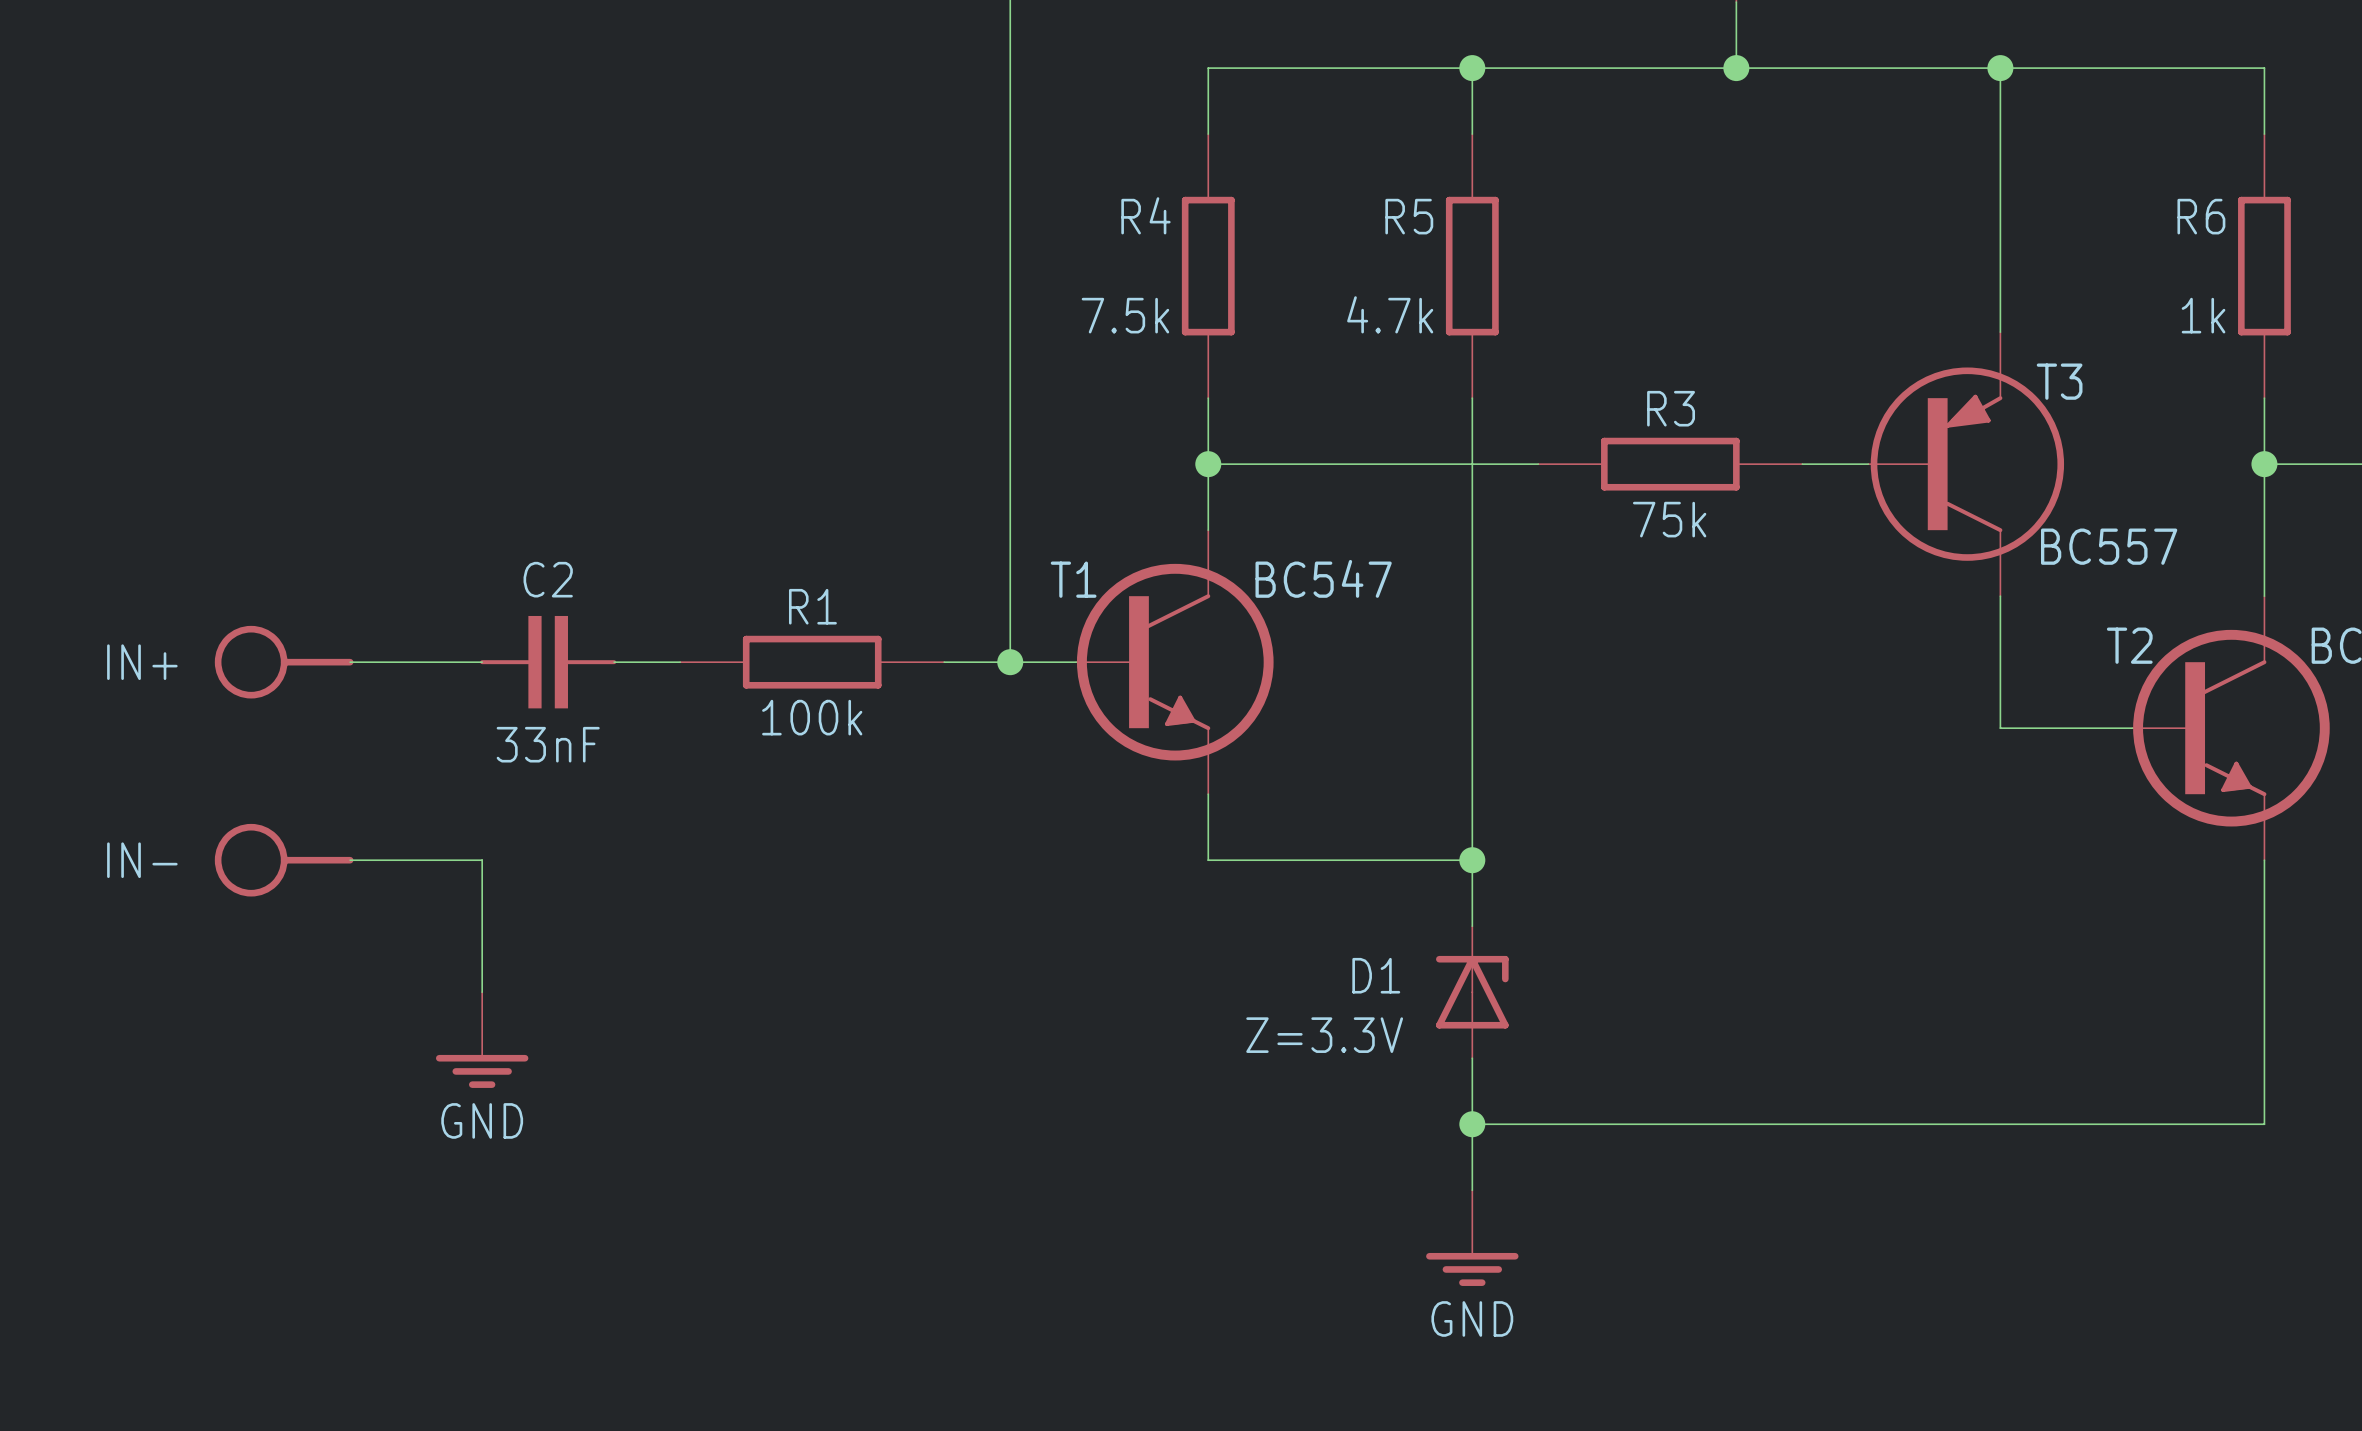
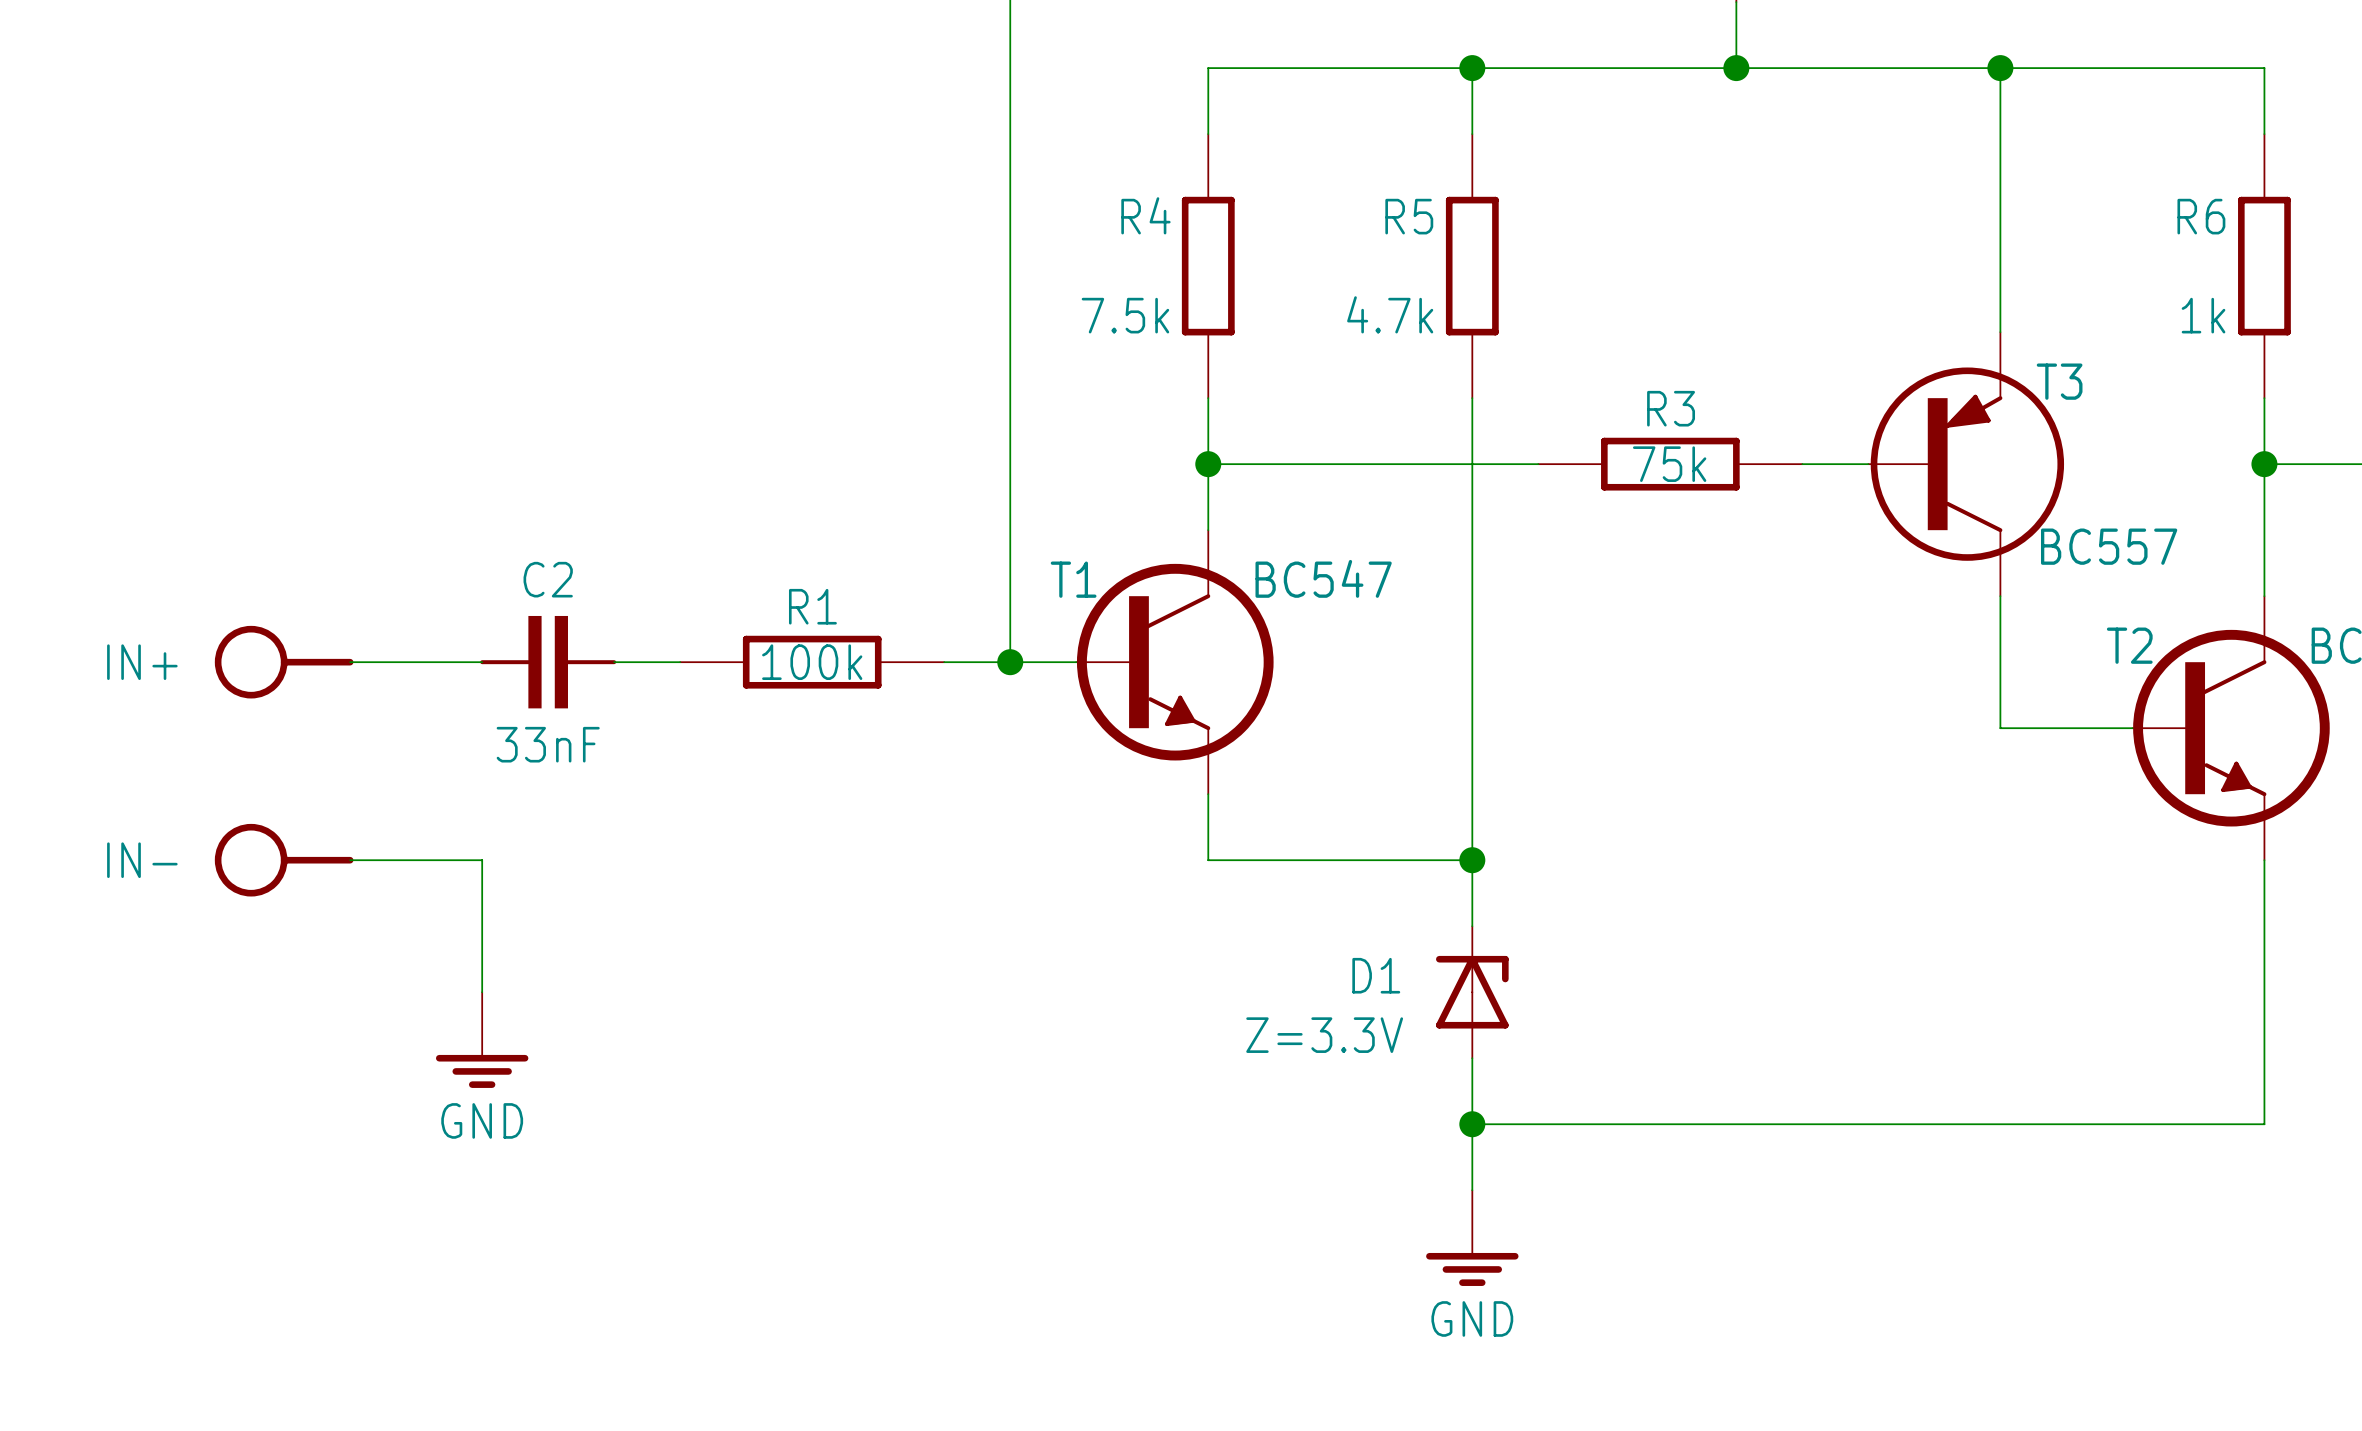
R3 value position: 75k (1669, 519) -> 75k (1669, 464)
R1 value position: 100k (812, 717) -> 100k (812, 662)

